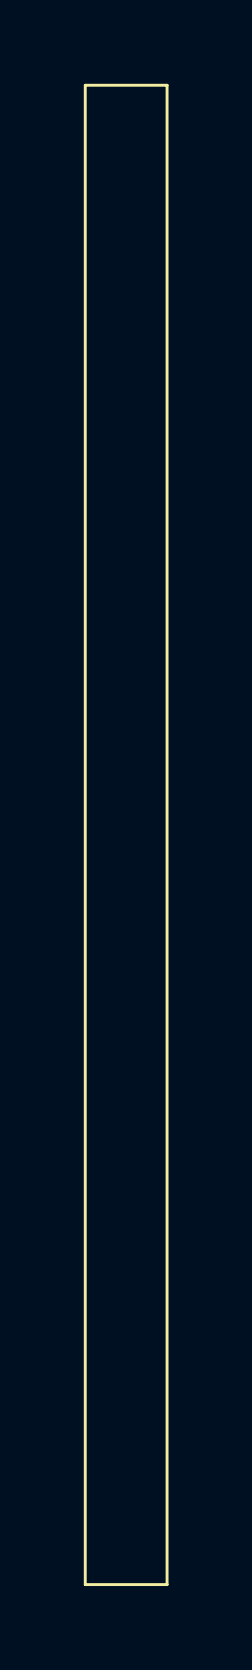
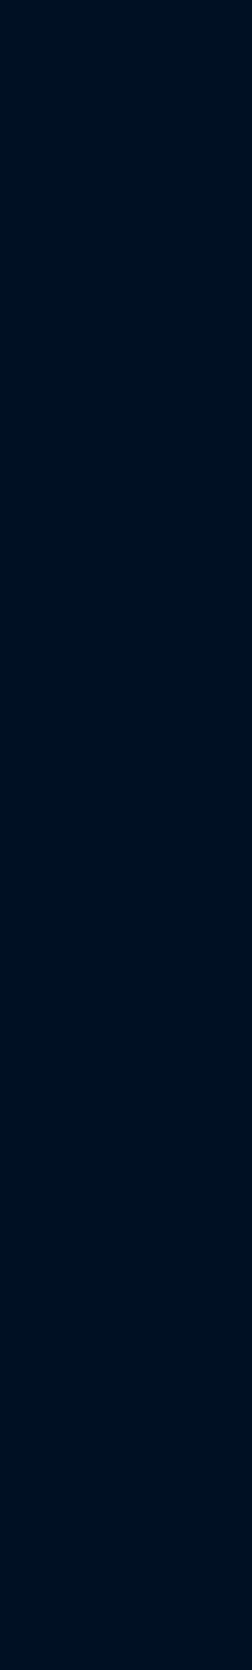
line: (85, 85) (167, 85) (167, 1584) (85, 1584) (85, 85) -> none

